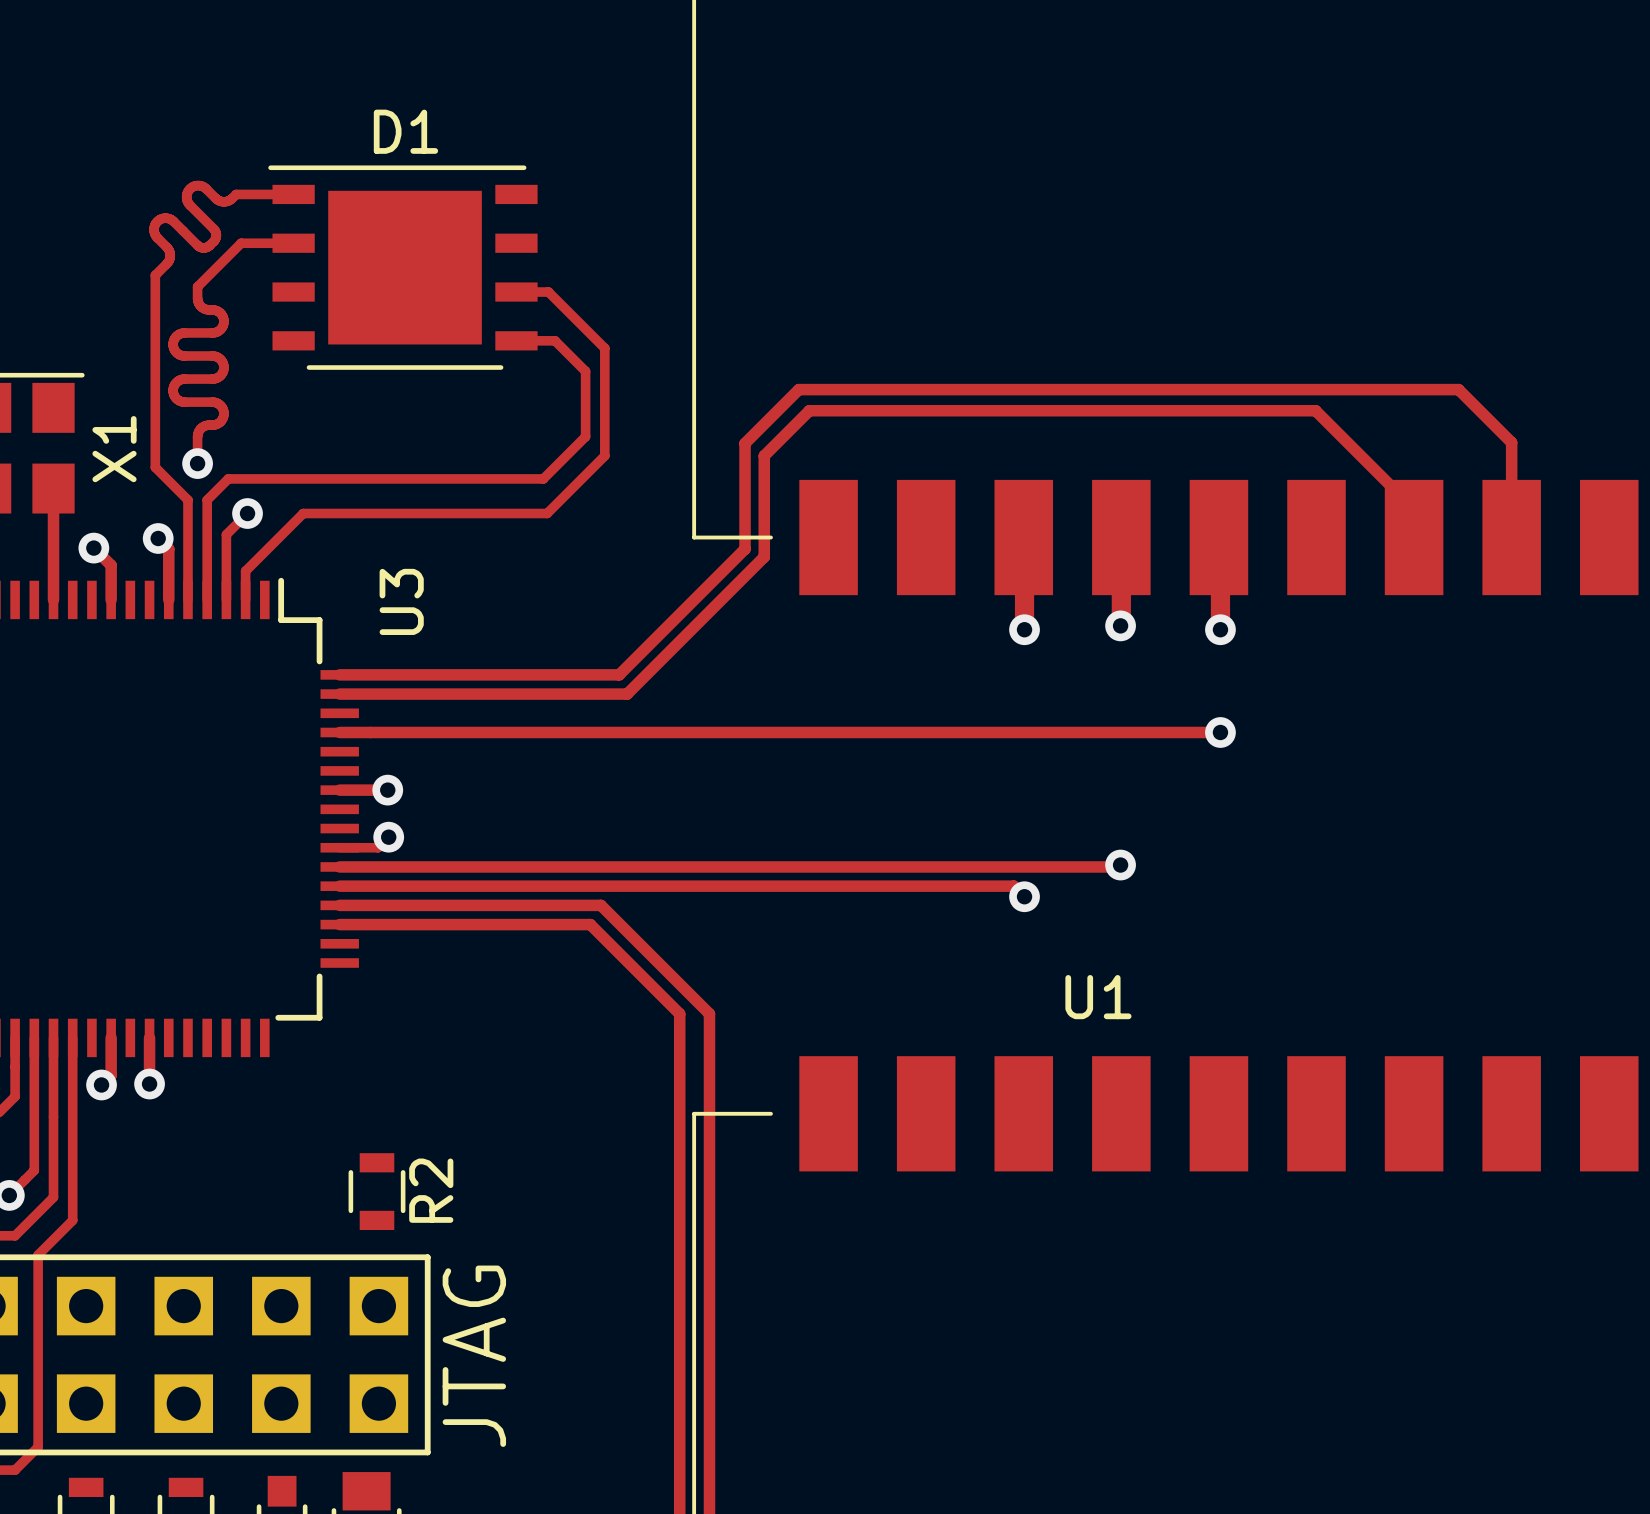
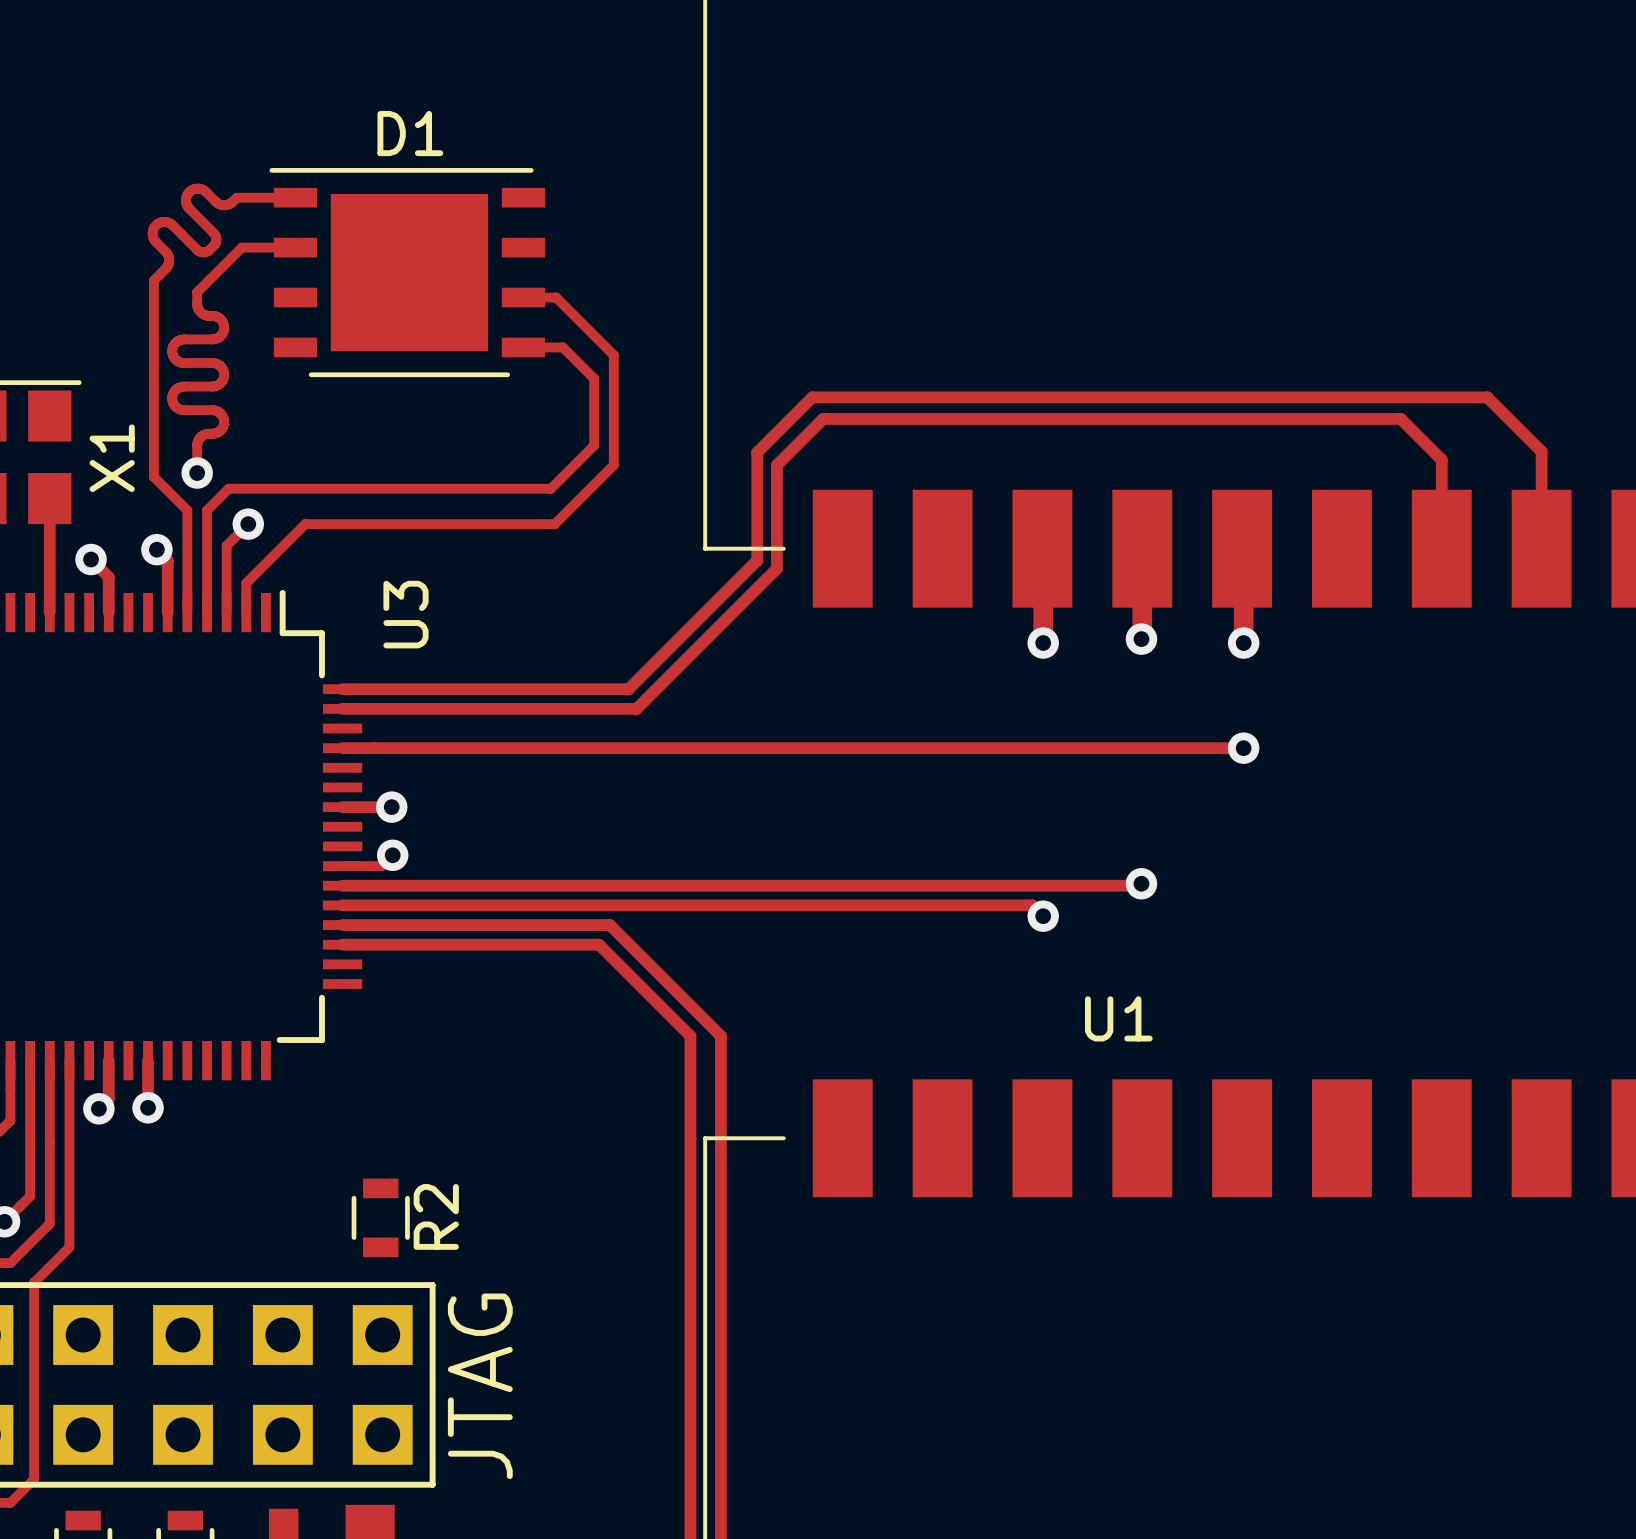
track: (1315, 410) (1414, 509) -> (1341, 418) (1400, 418) (1441, 459) (1441, 519)

